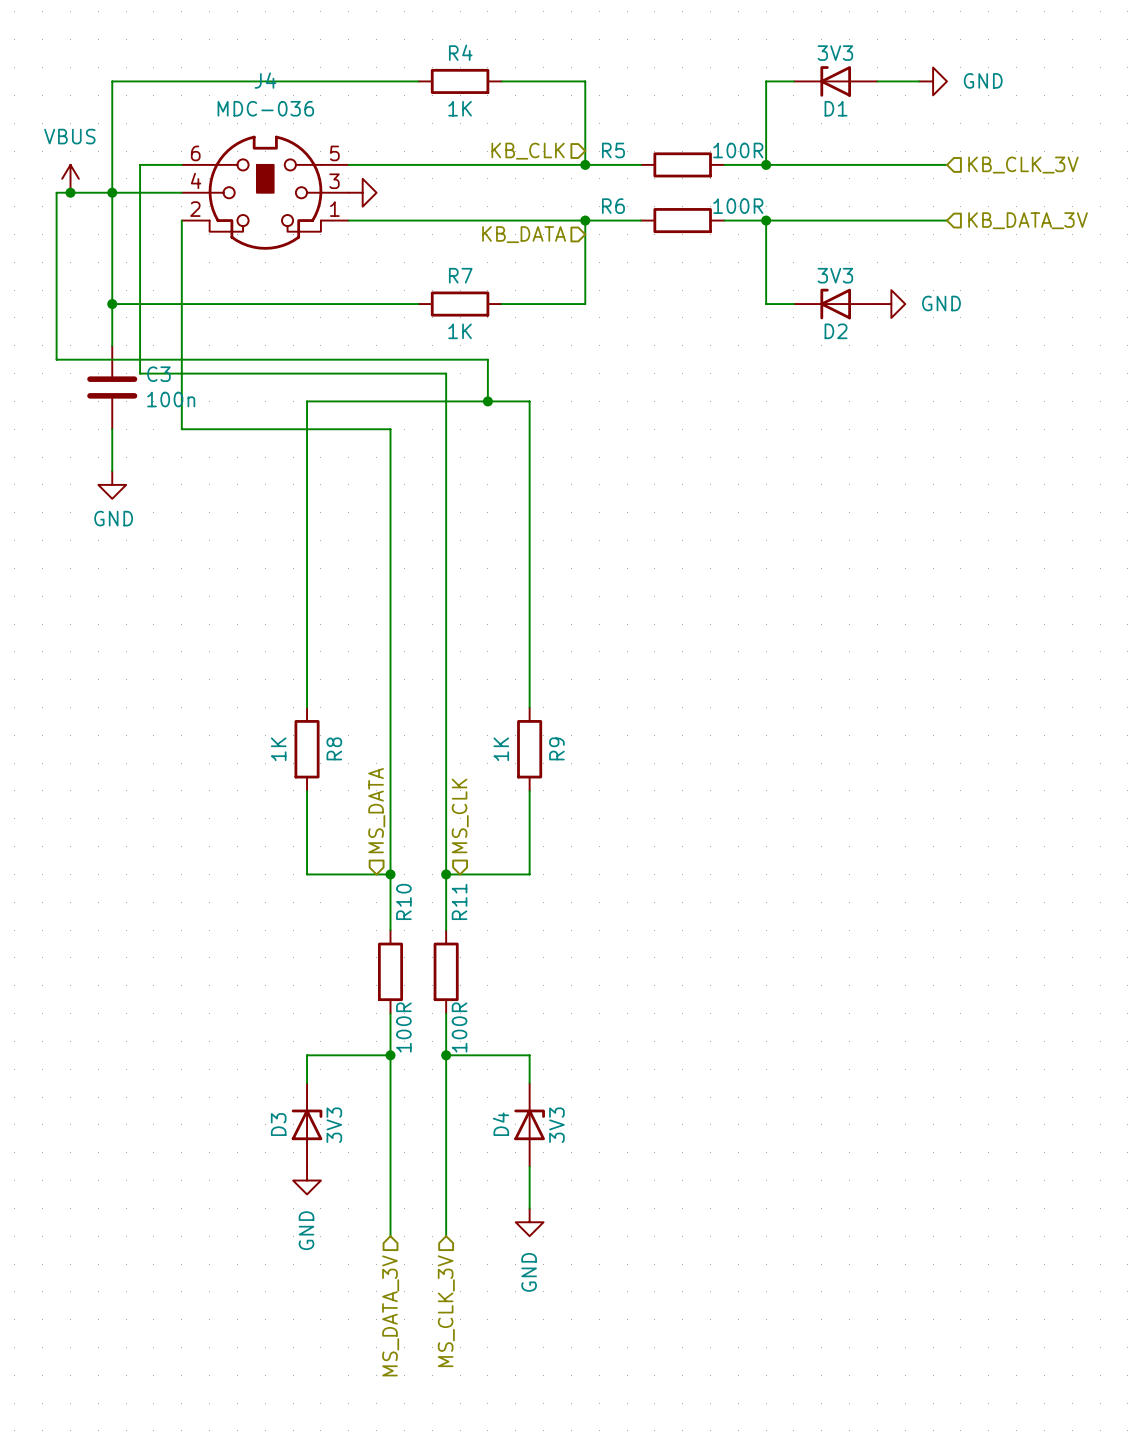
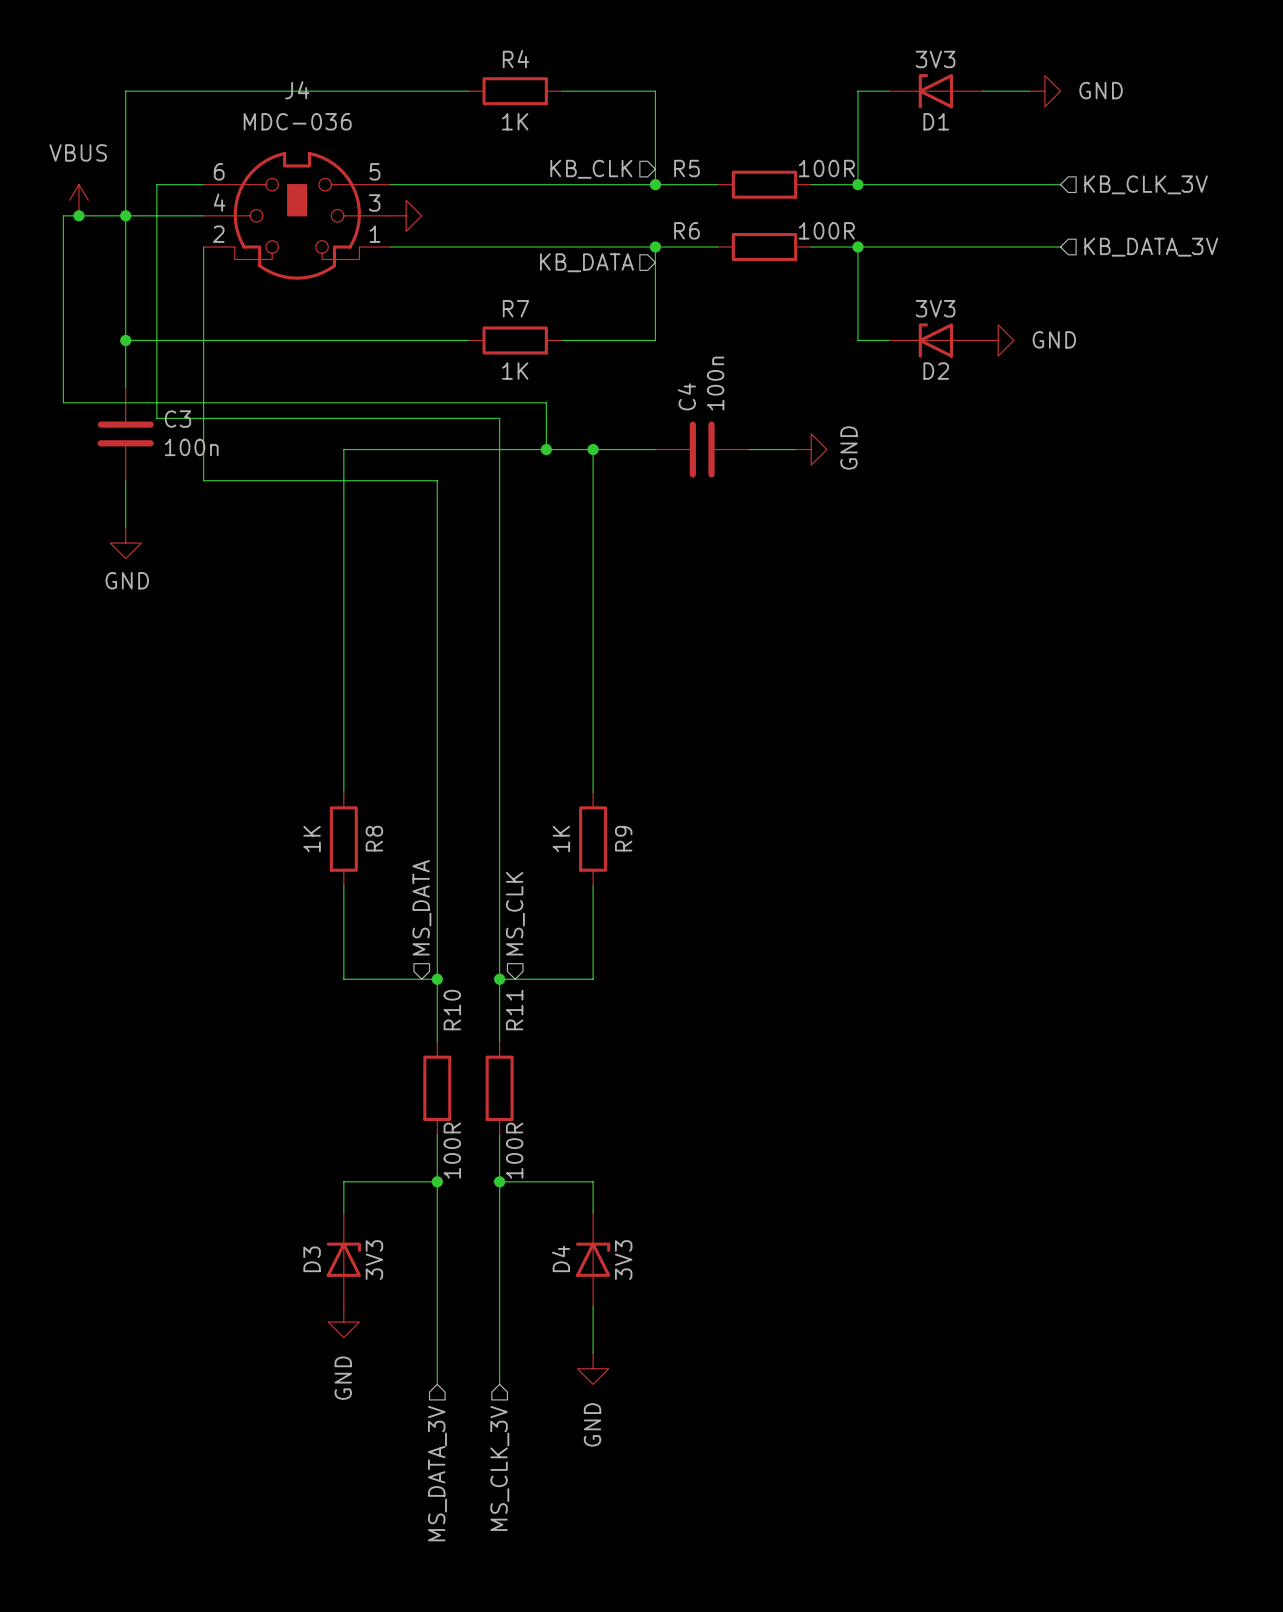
wire: none -> (593, 449) (655, 449)
junction: none -> (593, 449)
C4: none -> 100n (702, 449)
wire: none -> (748, 449) (795, 449)
power symbol: none -> GND (811, 449)

